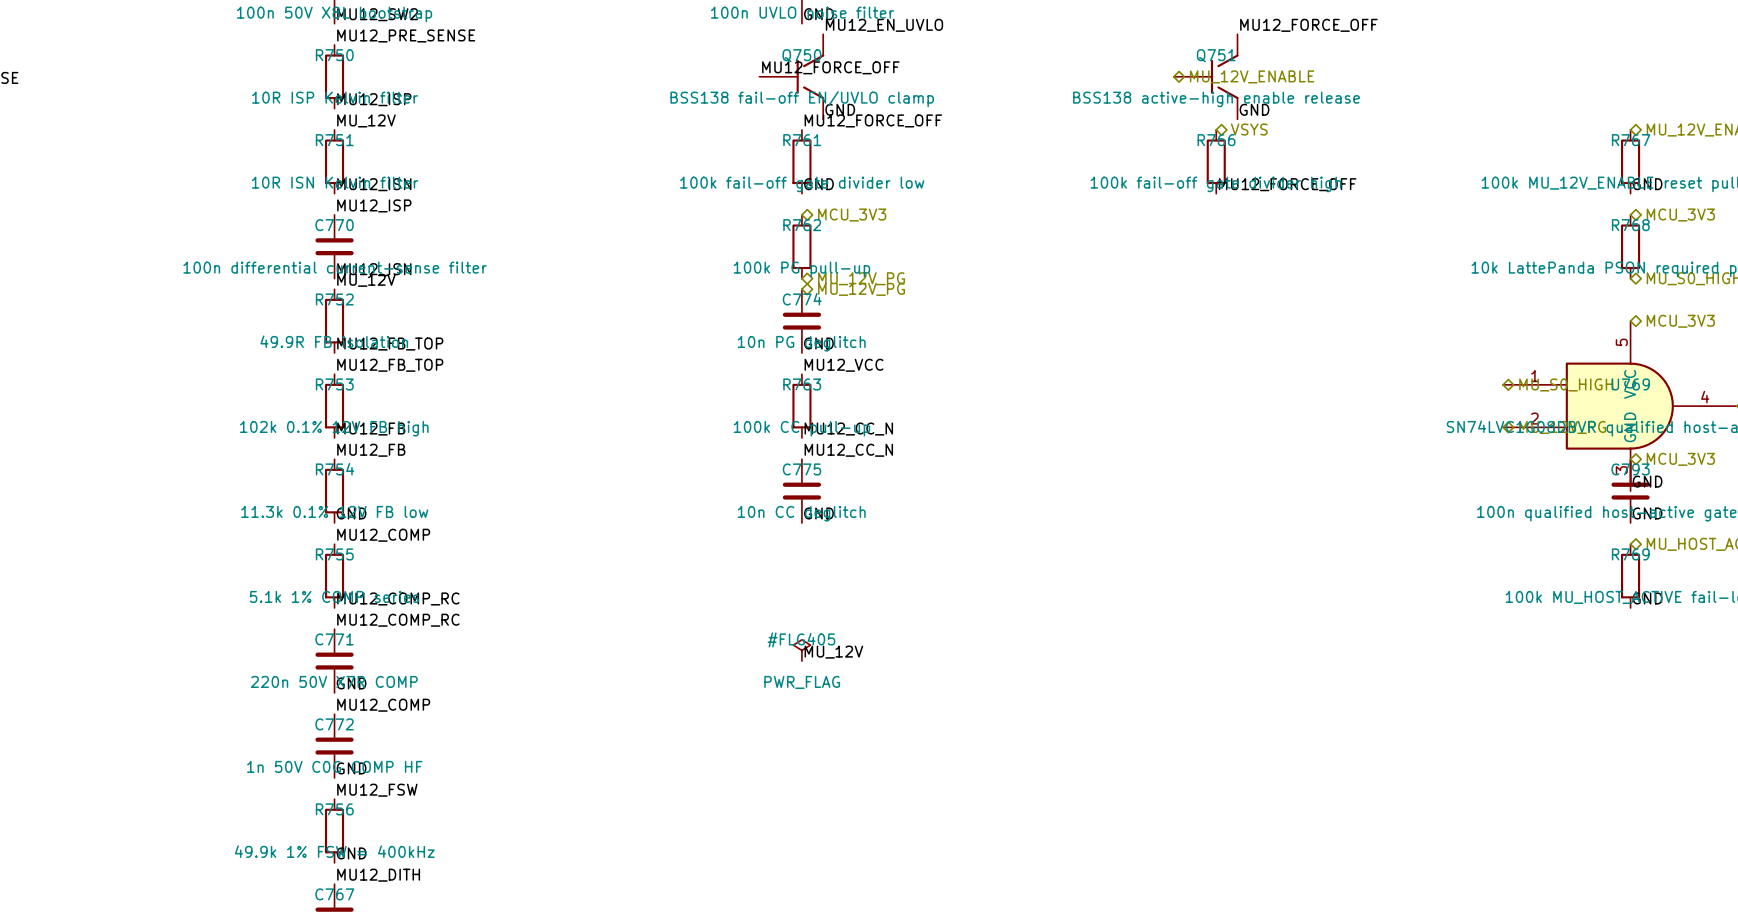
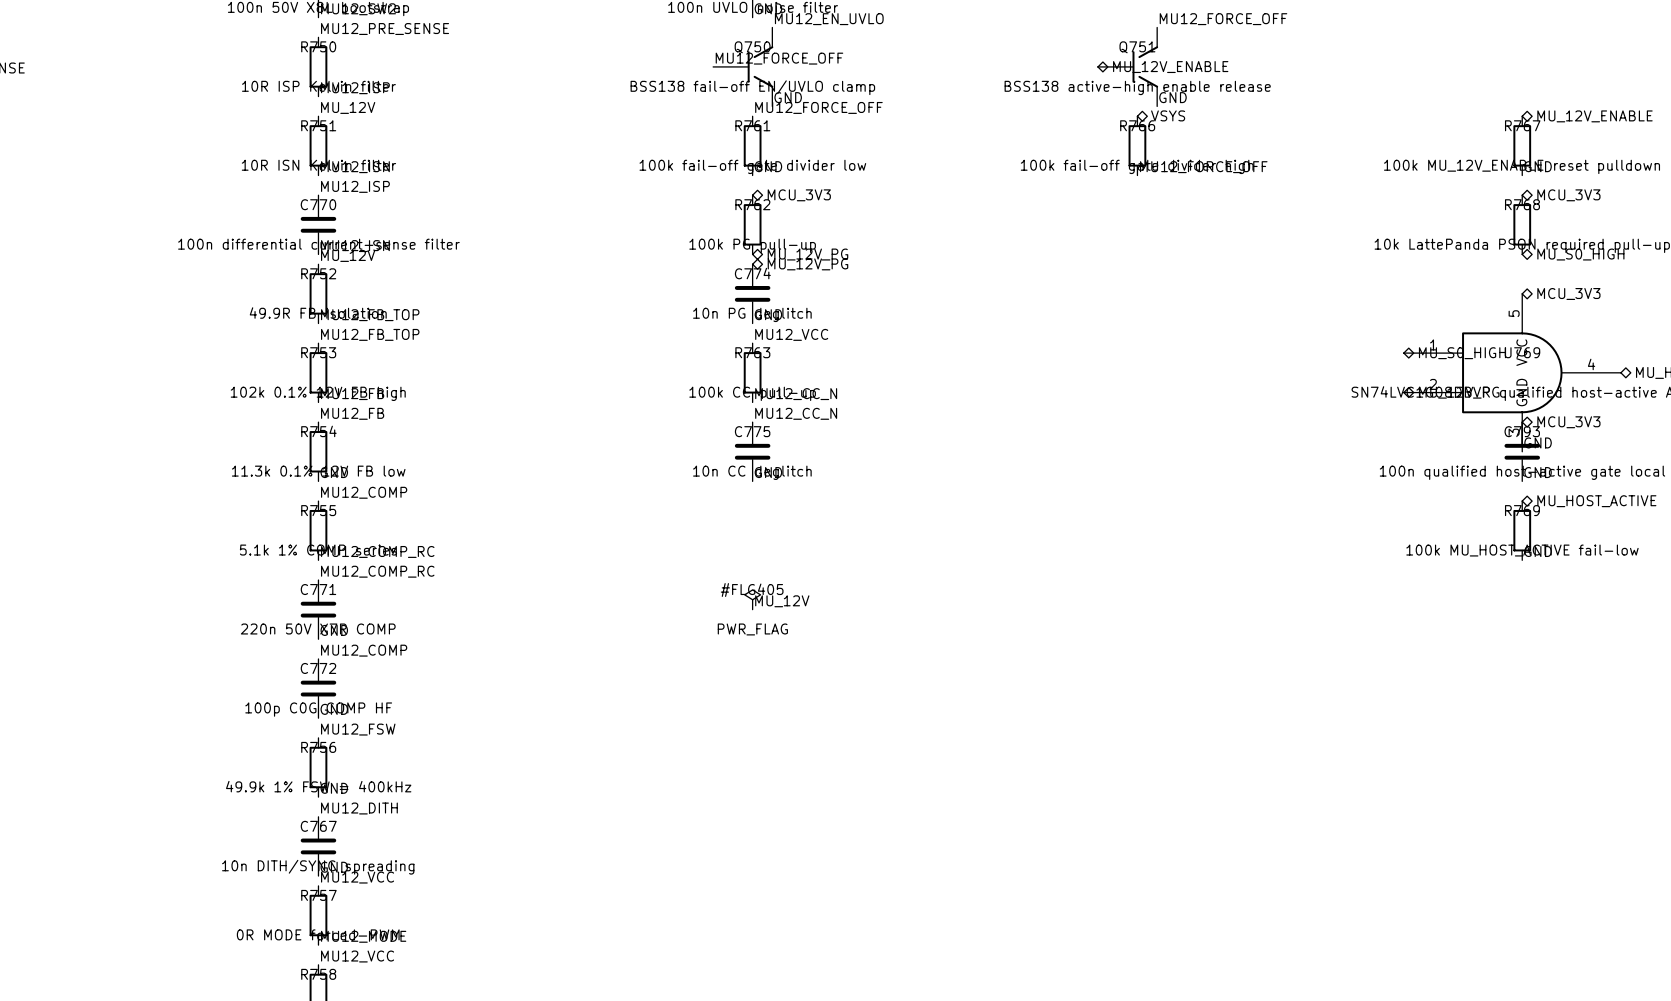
C772 value: 1n 50V C0G COMP HF (334, 766) -> 100p C0G COMP HF (318, 709)

